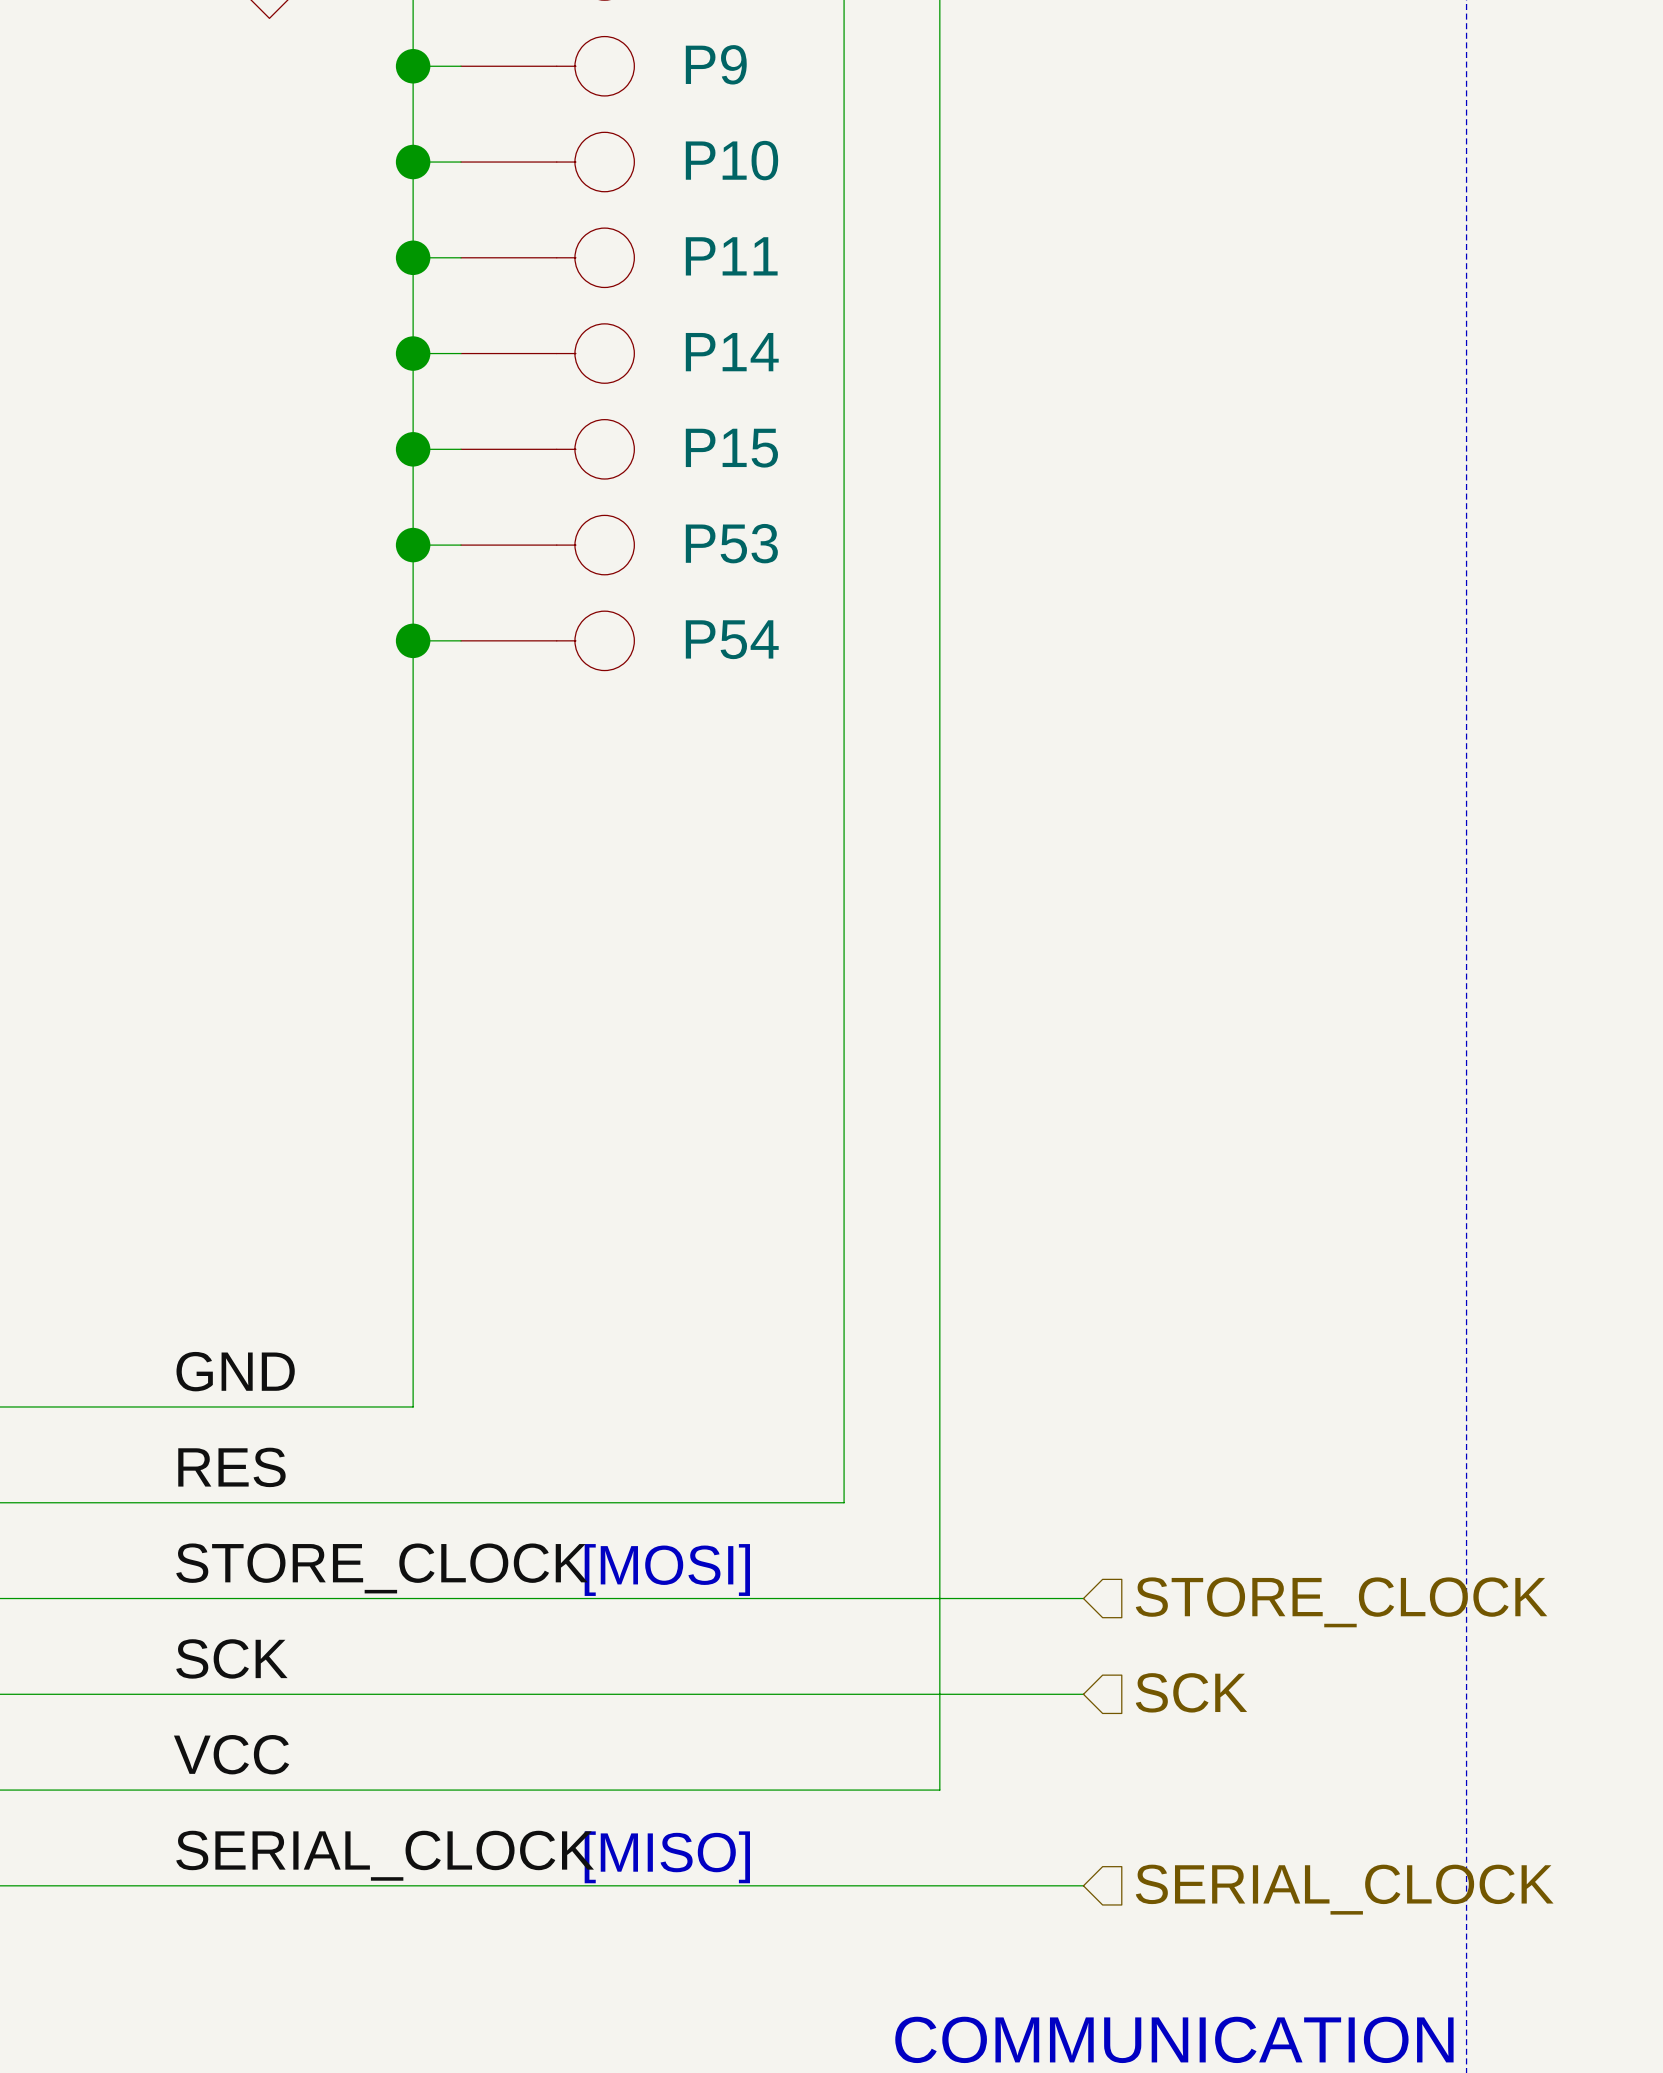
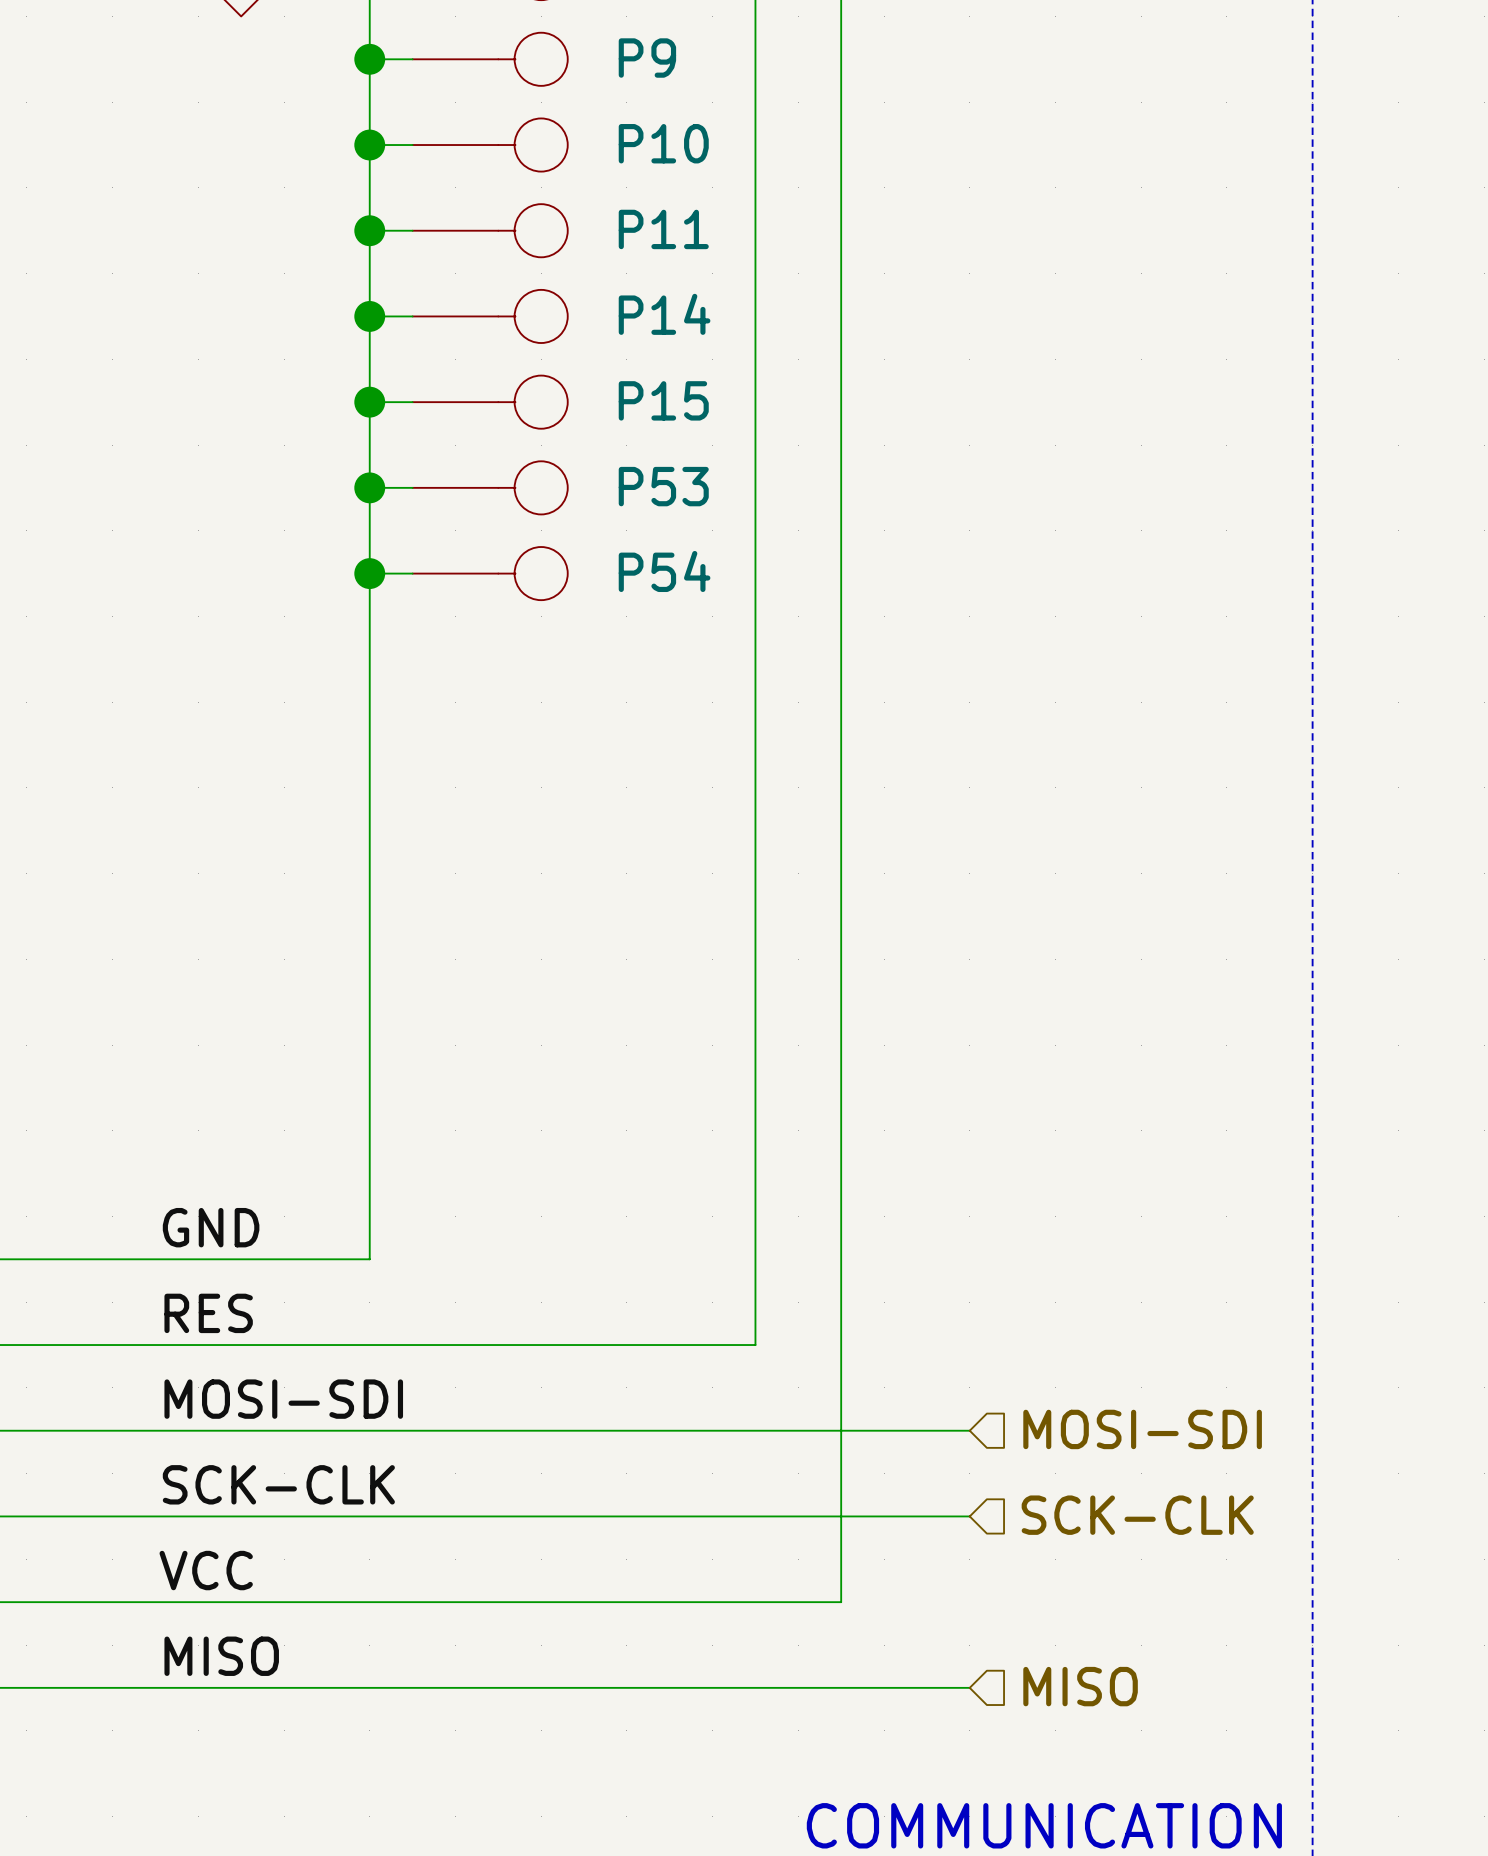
label: STORE_CLOCK (381, 1568) -> MOSI-SDI (283, 1399)
text: [MOSI] (667, 1570) -> none
hierarchical label: STORE_CLOCK (1341, 1602) -> MOSI-SDI (1142, 1429)
label: SCK (231, 1658) -> SCK-CLK (278, 1484)
hierarchical label: SCK (1191, 1692) -> SCK-CLK (1137, 1515)
label: SERIAL_CLOCK (385, 1855) -> MISO (221, 1656)
text: [MISO] (667, 1857) -> none
hierarchical label: SERIAL_CLOCK (1344, 1889) -> MISO (1080, 1686)

